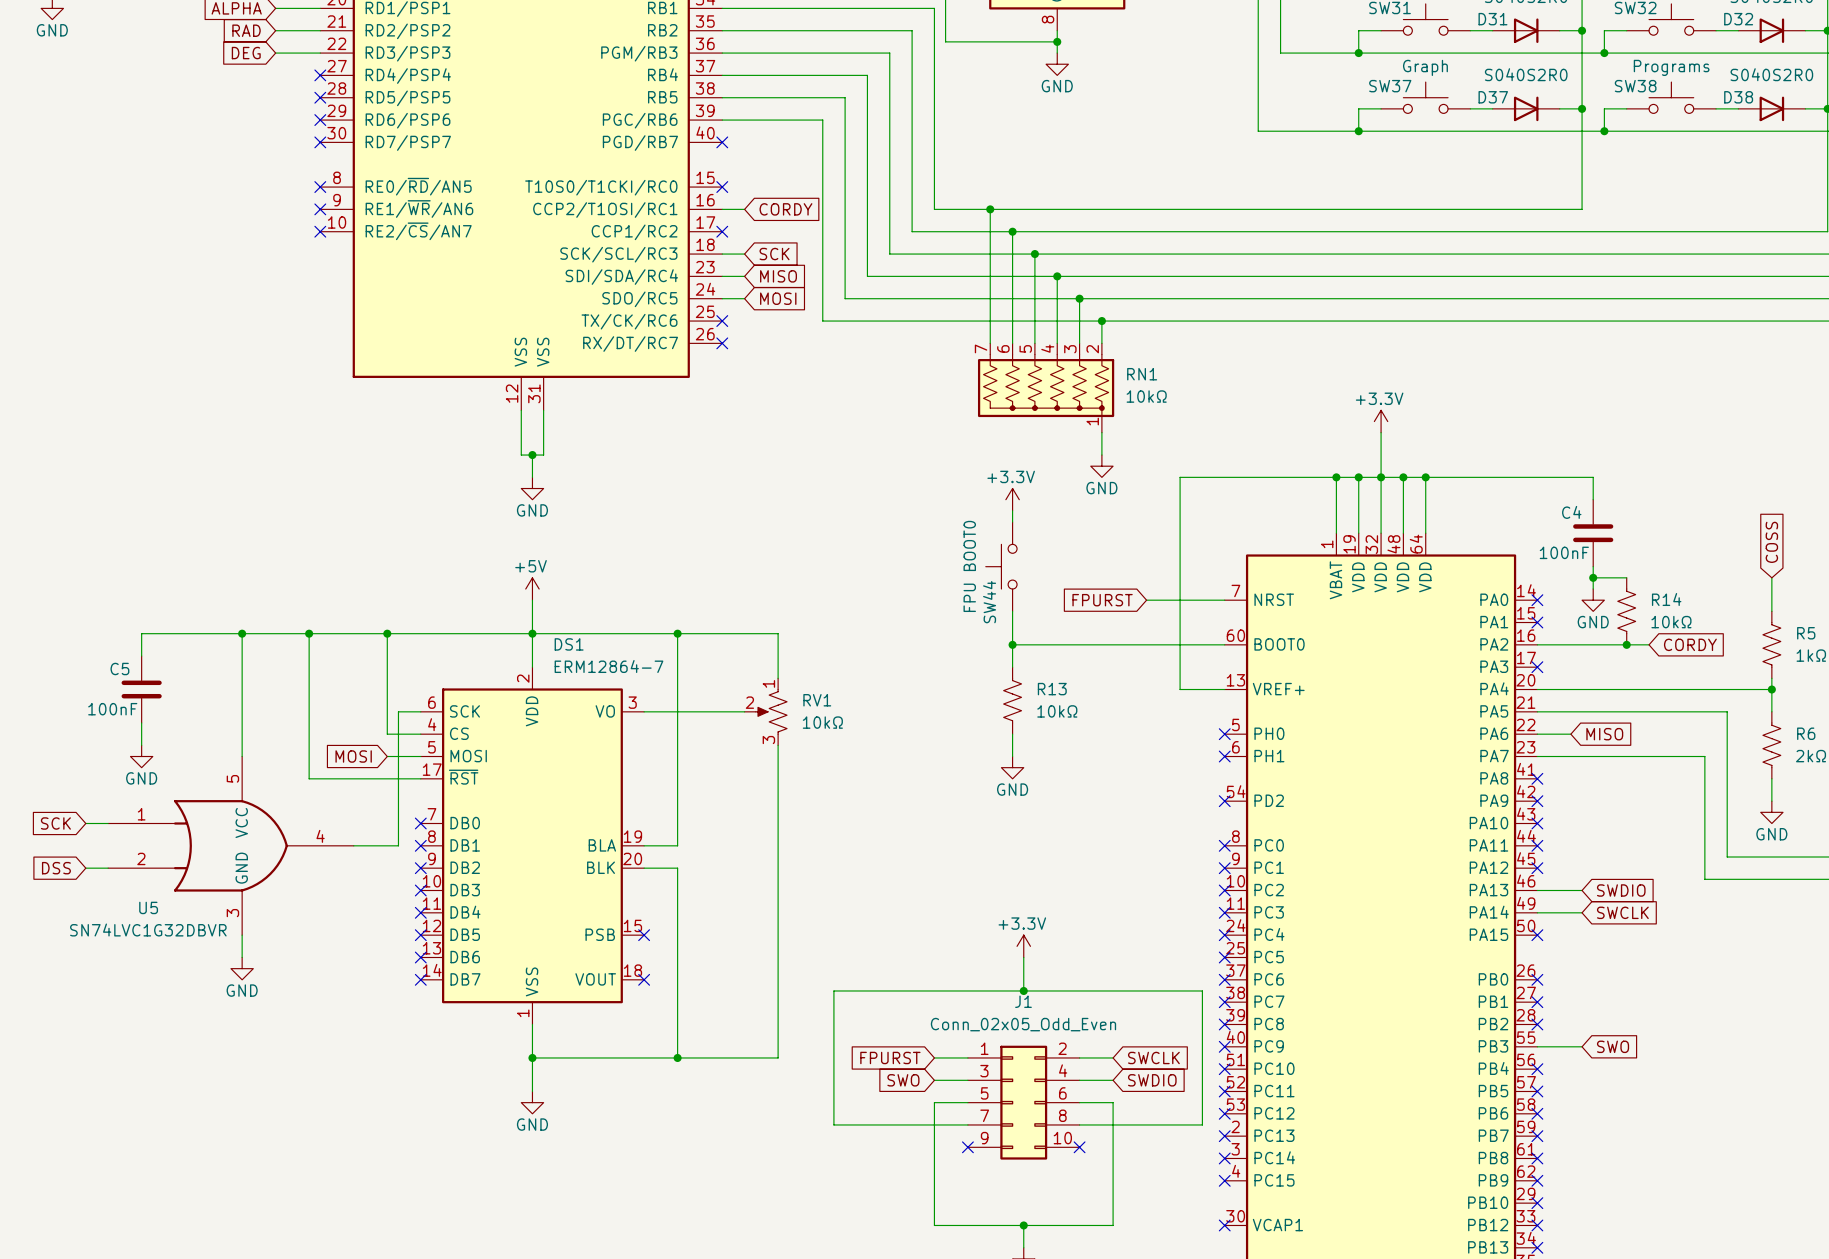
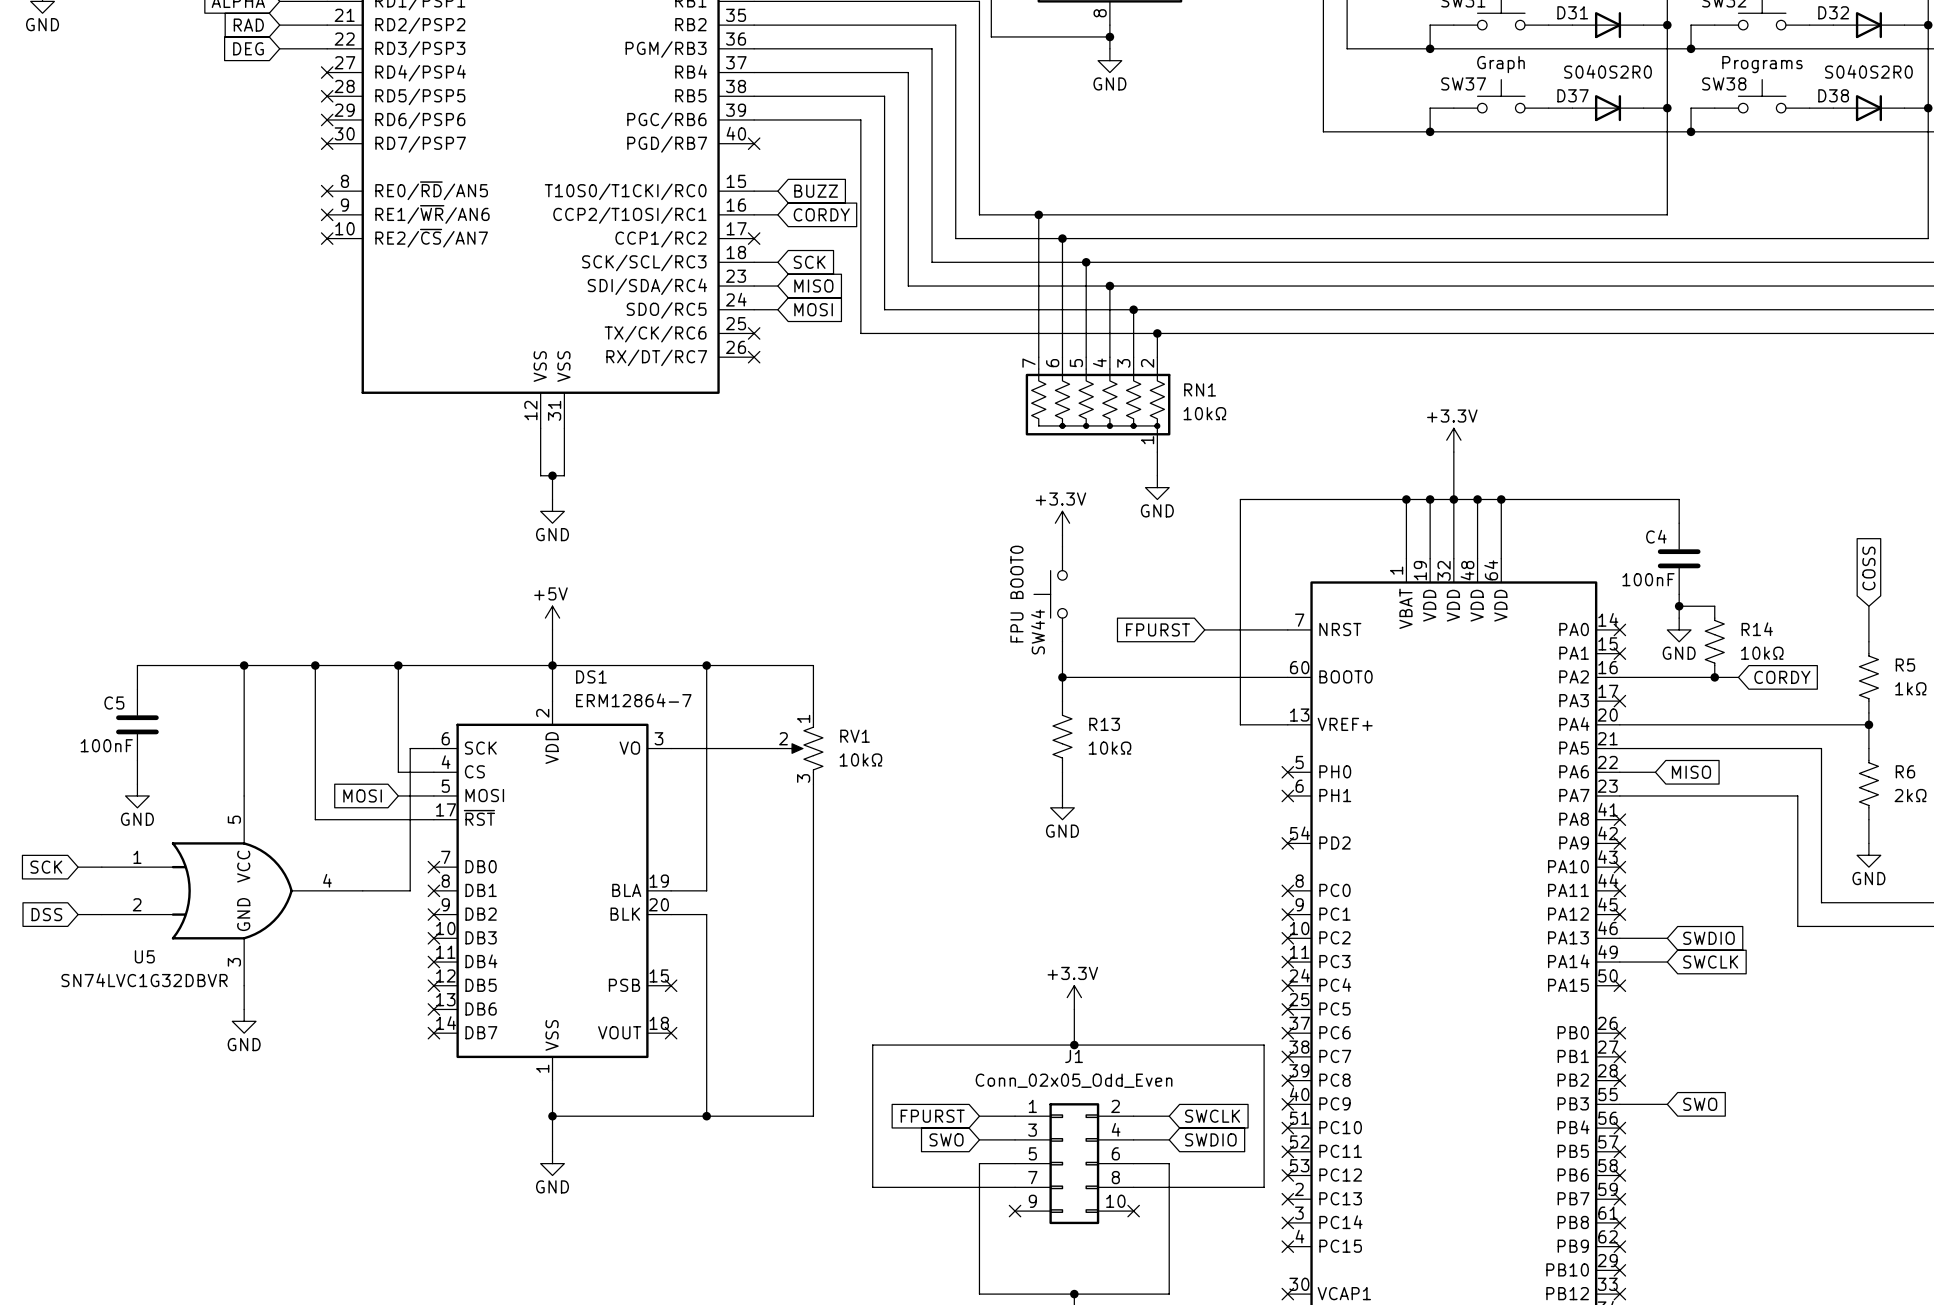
wire: none -> (754, 191) (777, 191)
no-connect mark: (722, 187) -> none
global label: none -> BUZZ (816, 191)

